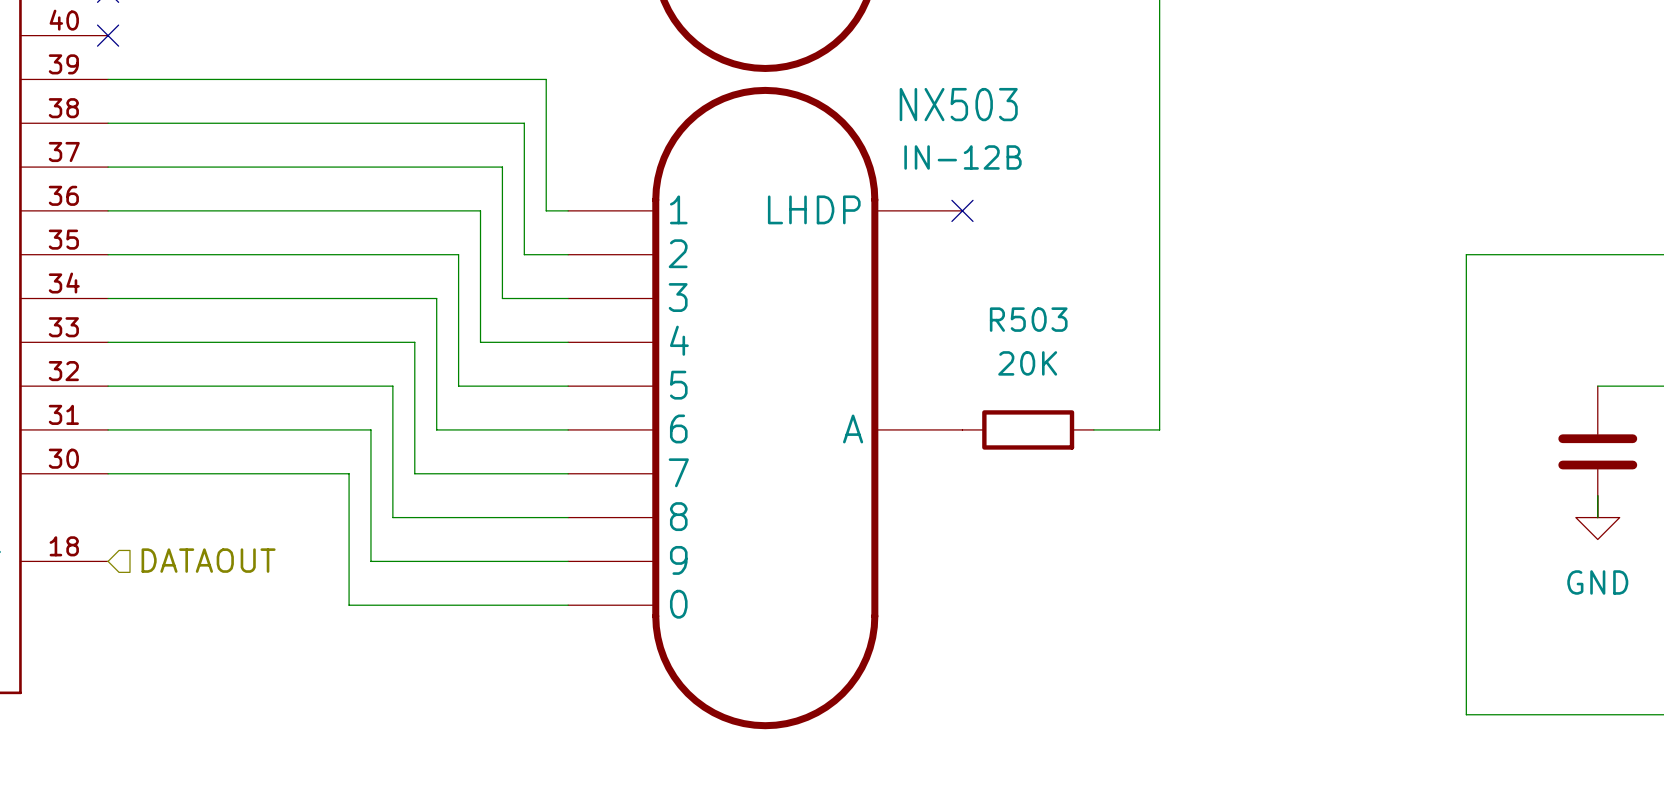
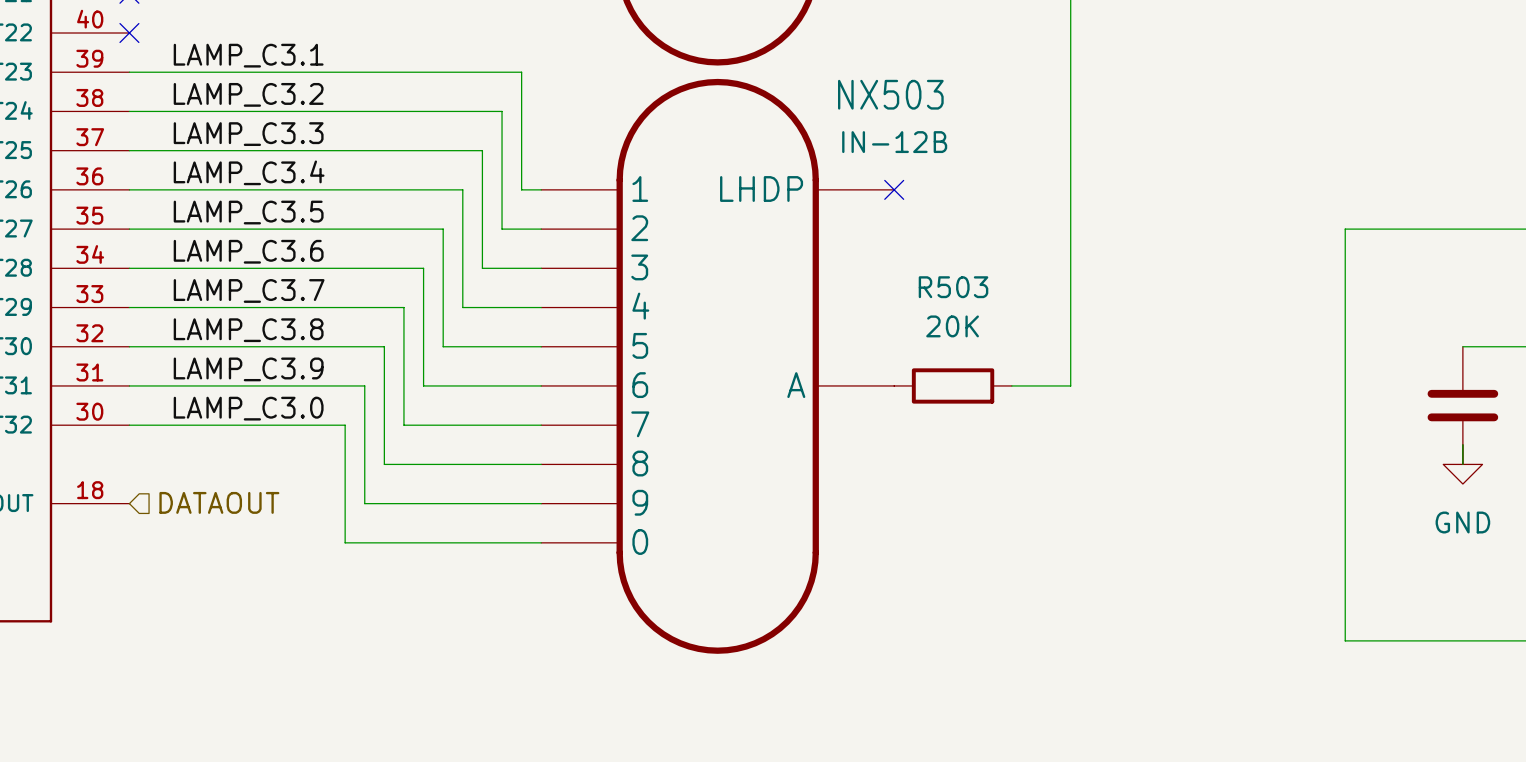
label: none -> LAMP_C3.1 (248, 55)
label: none -> LAMP_C3.2 (248, 94)
label: none -> LAMP_C3.3 (248, 134)
label: none -> LAMP_C3.4 (249, 172)
label: none -> LAMP_C3.5 (248, 212)
label: none -> LAMP_C3.6 (248, 251)
label: none -> LAMP_C3.7 (249, 290)
label: none -> LAMP_C3.8 (248, 330)
label: none -> LAMP_C3.9 (248, 369)
label: none -> LAMP_C3.0 (248, 408)

